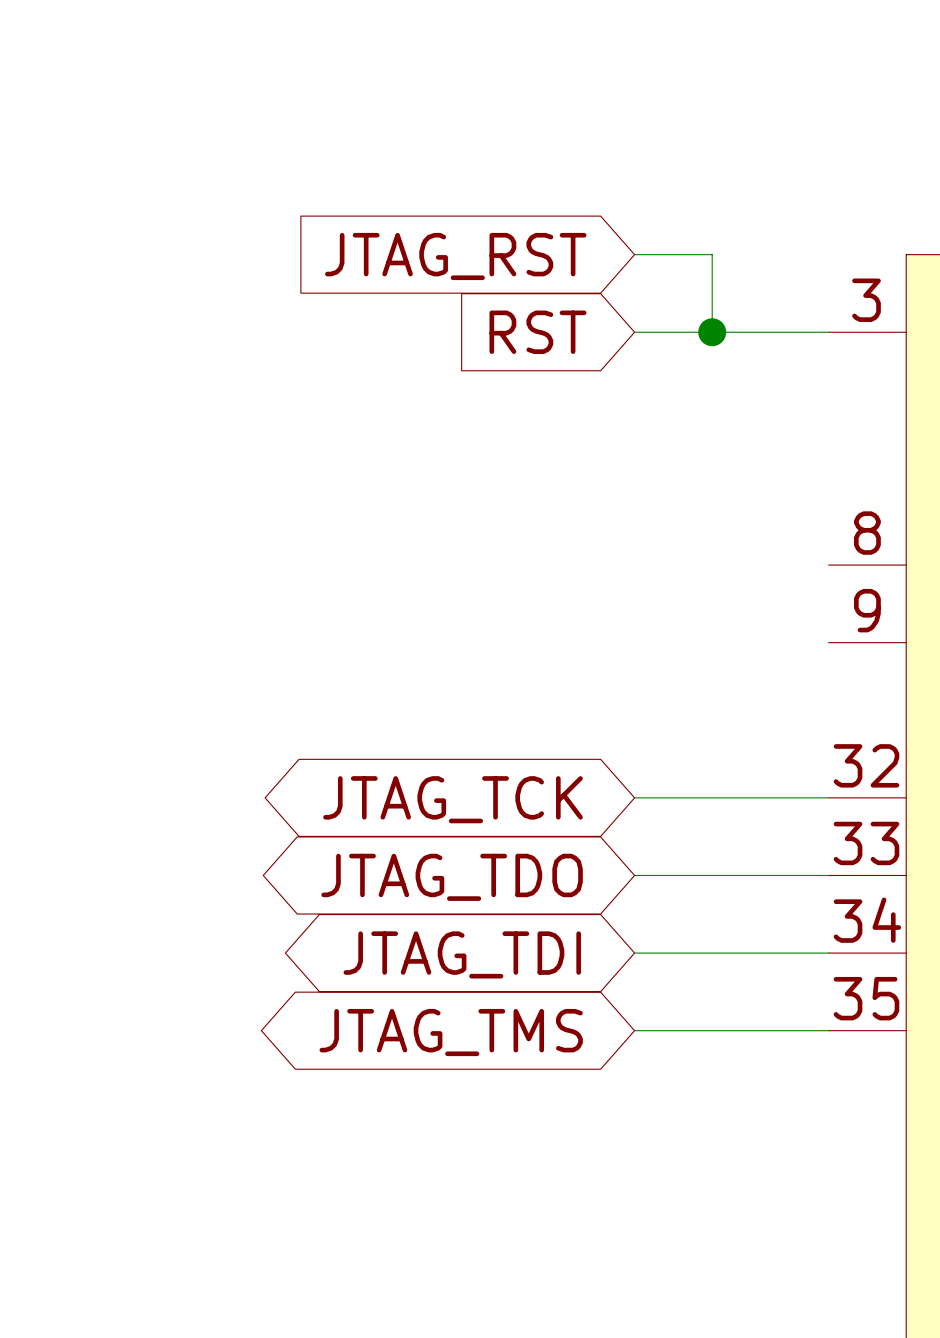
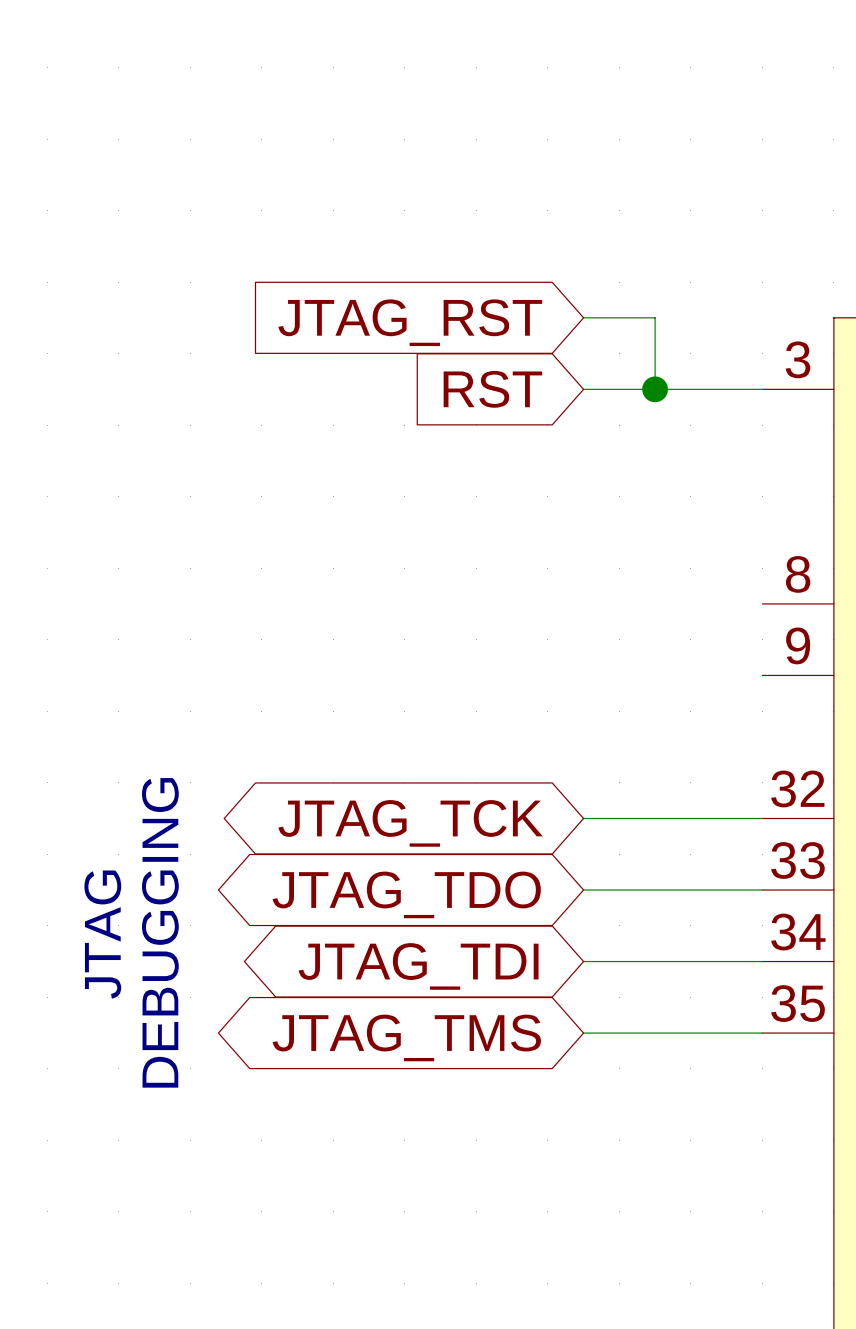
text: none -> DEBUGGING (160, 932)
text: none -> JTAG (102, 934)

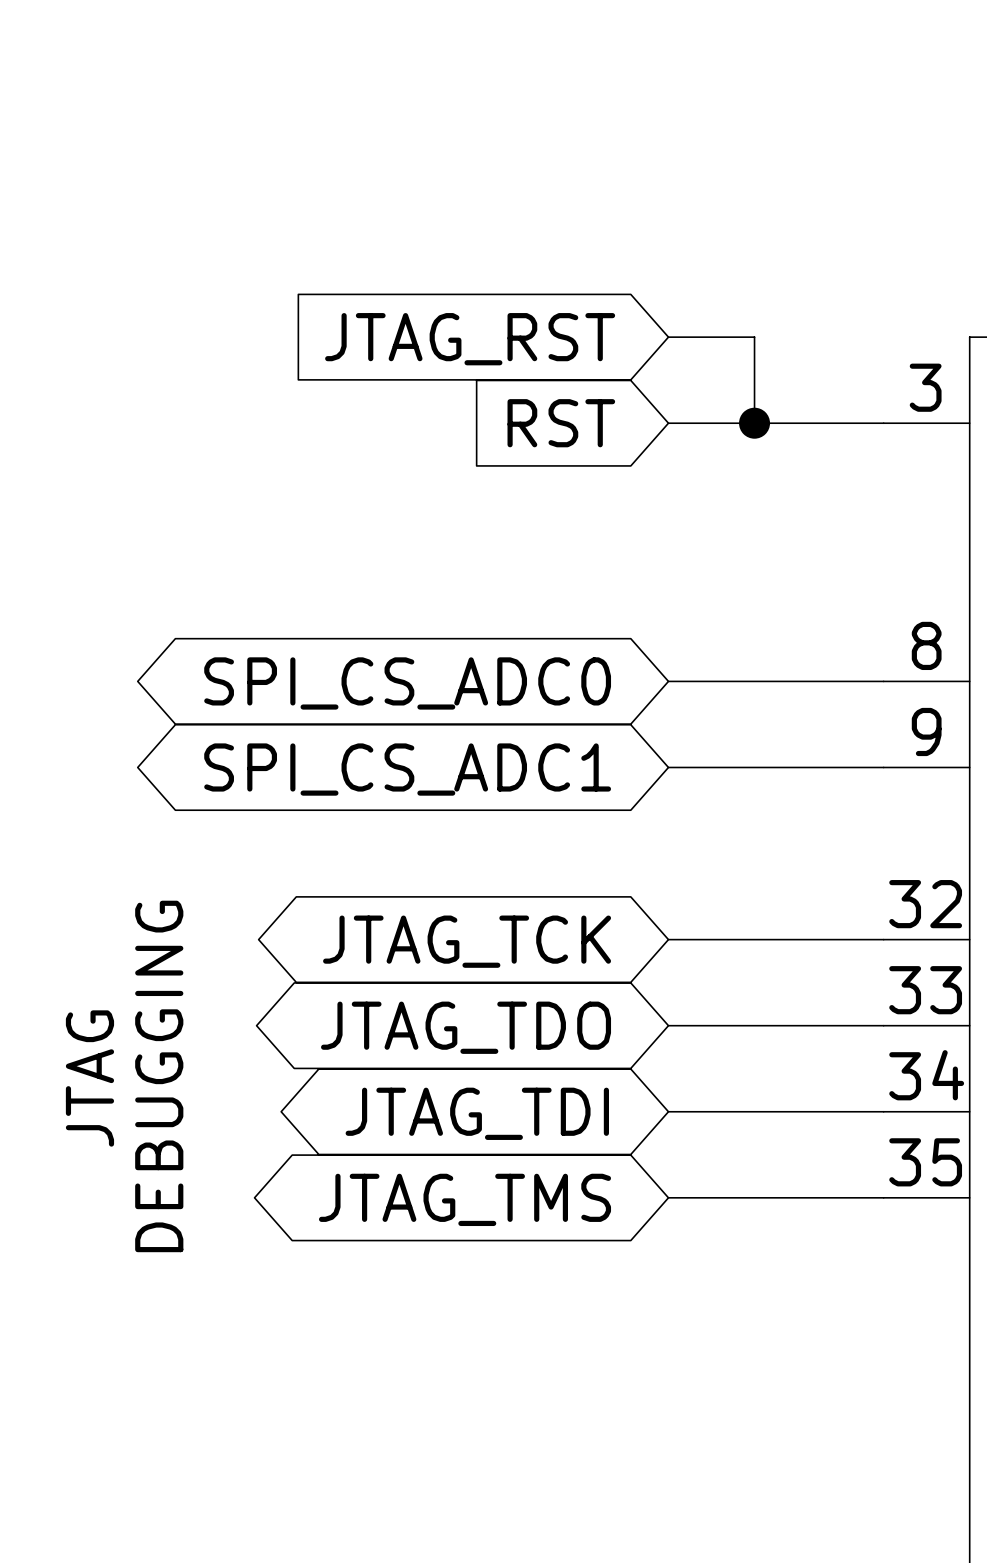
wire: none -> (668, 681) (883, 681)
global label: none -> SPI_CS_ADC0 (407, 683)
wire: none -> (668, 767) (883, 767)
global label: none -> SPI_CS_ADC1 (407, 769)

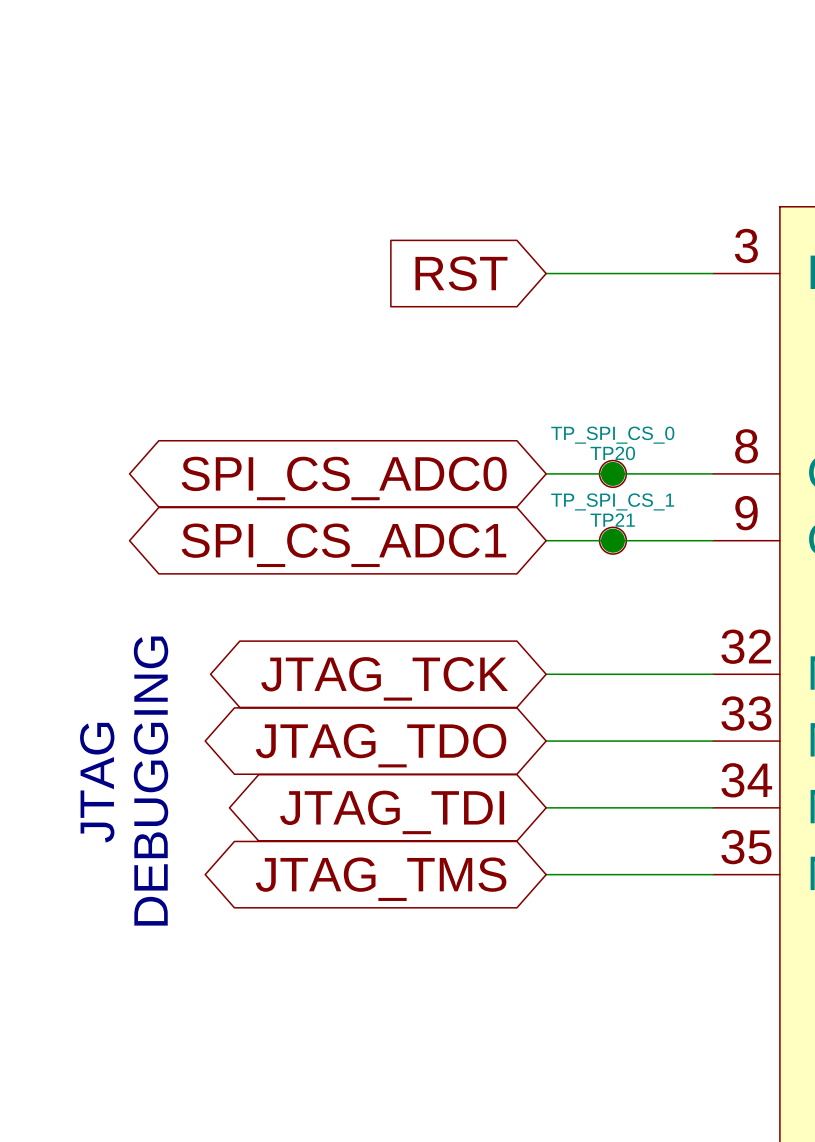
wire: (668, 337) (754, 337) (754, 423) -> none
global label: JTAG_RST (470, 339) -> none
junction: (754, 423) -> none
junction: none -> (612, 473)
TP20: none -> TP_SPI_CS_0 (612, 473)
junction: none -> (612, 540)
TP21: none -> TP_SPI_CS_1 (612, 540)

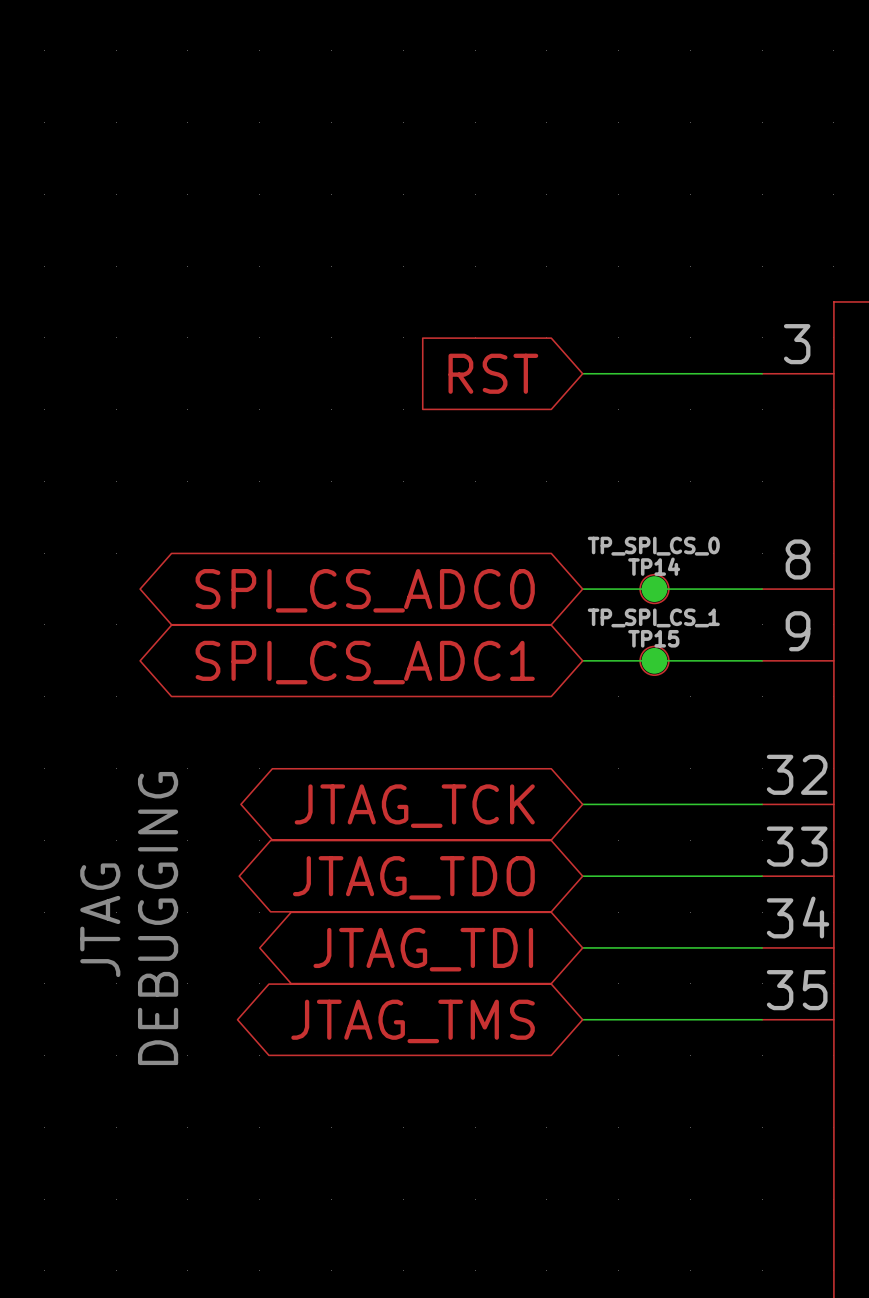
TP20 name: TP20 (612, 453) -> TP14 (654, 566)
TP21 name: TP21 (612, 520) -> TP15 (653, 638)

